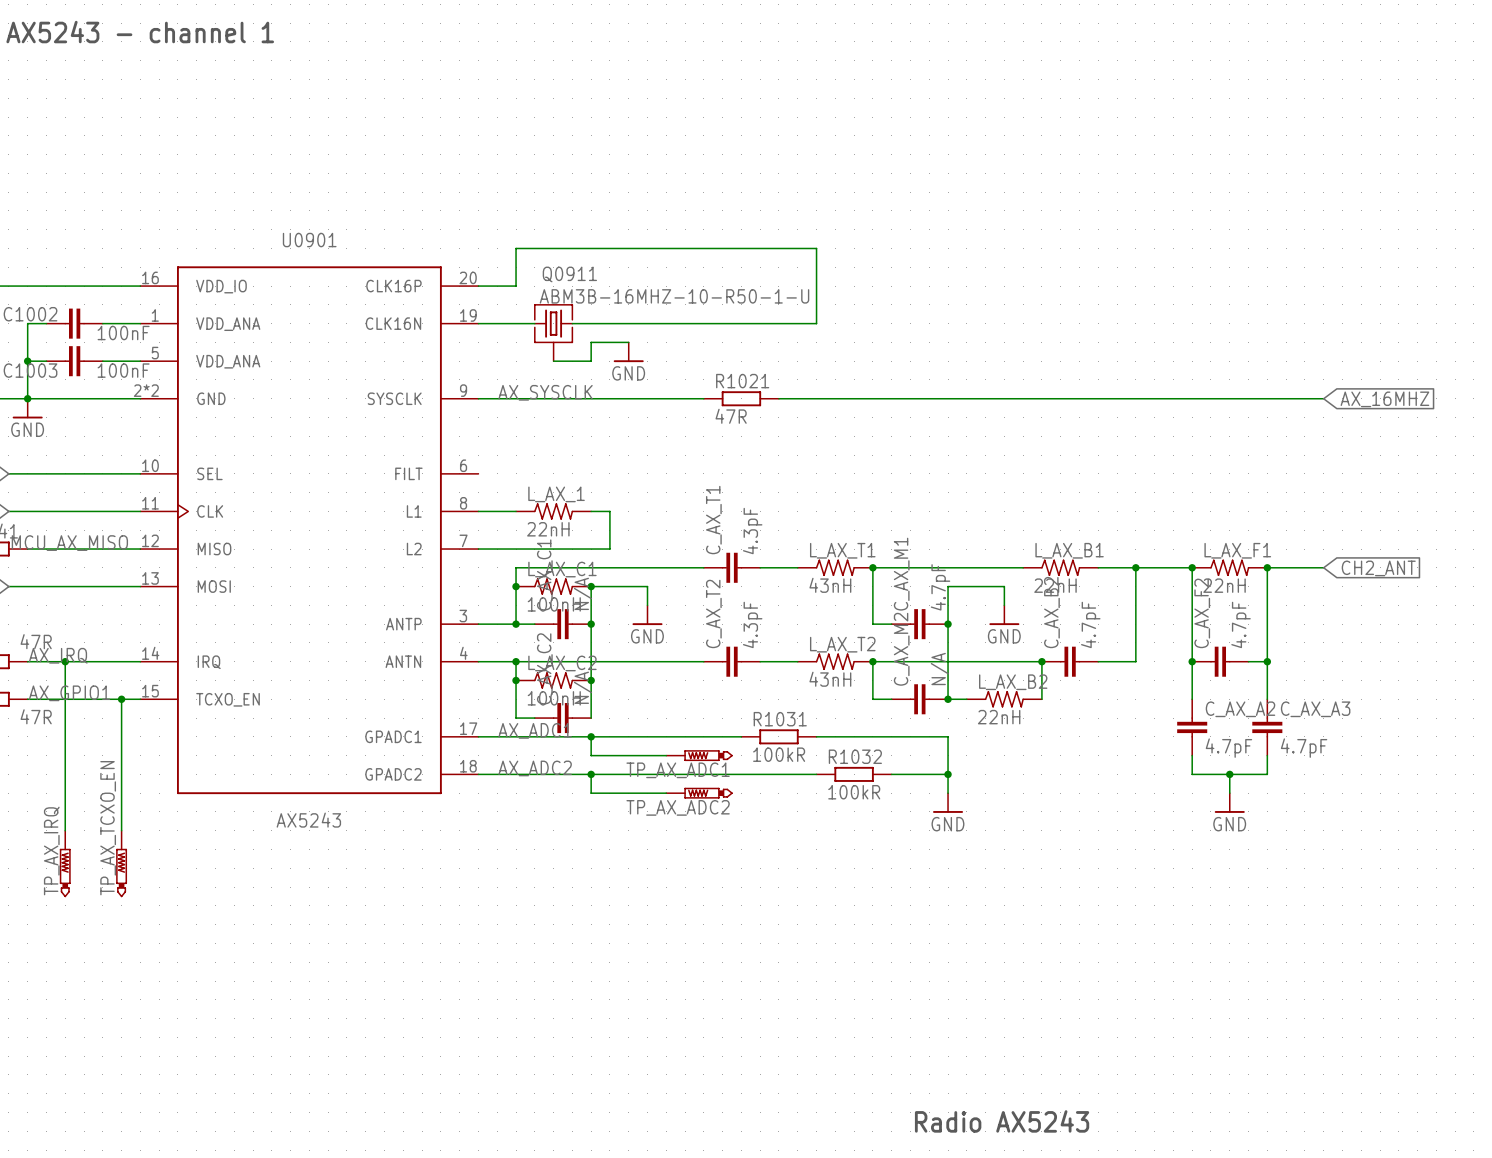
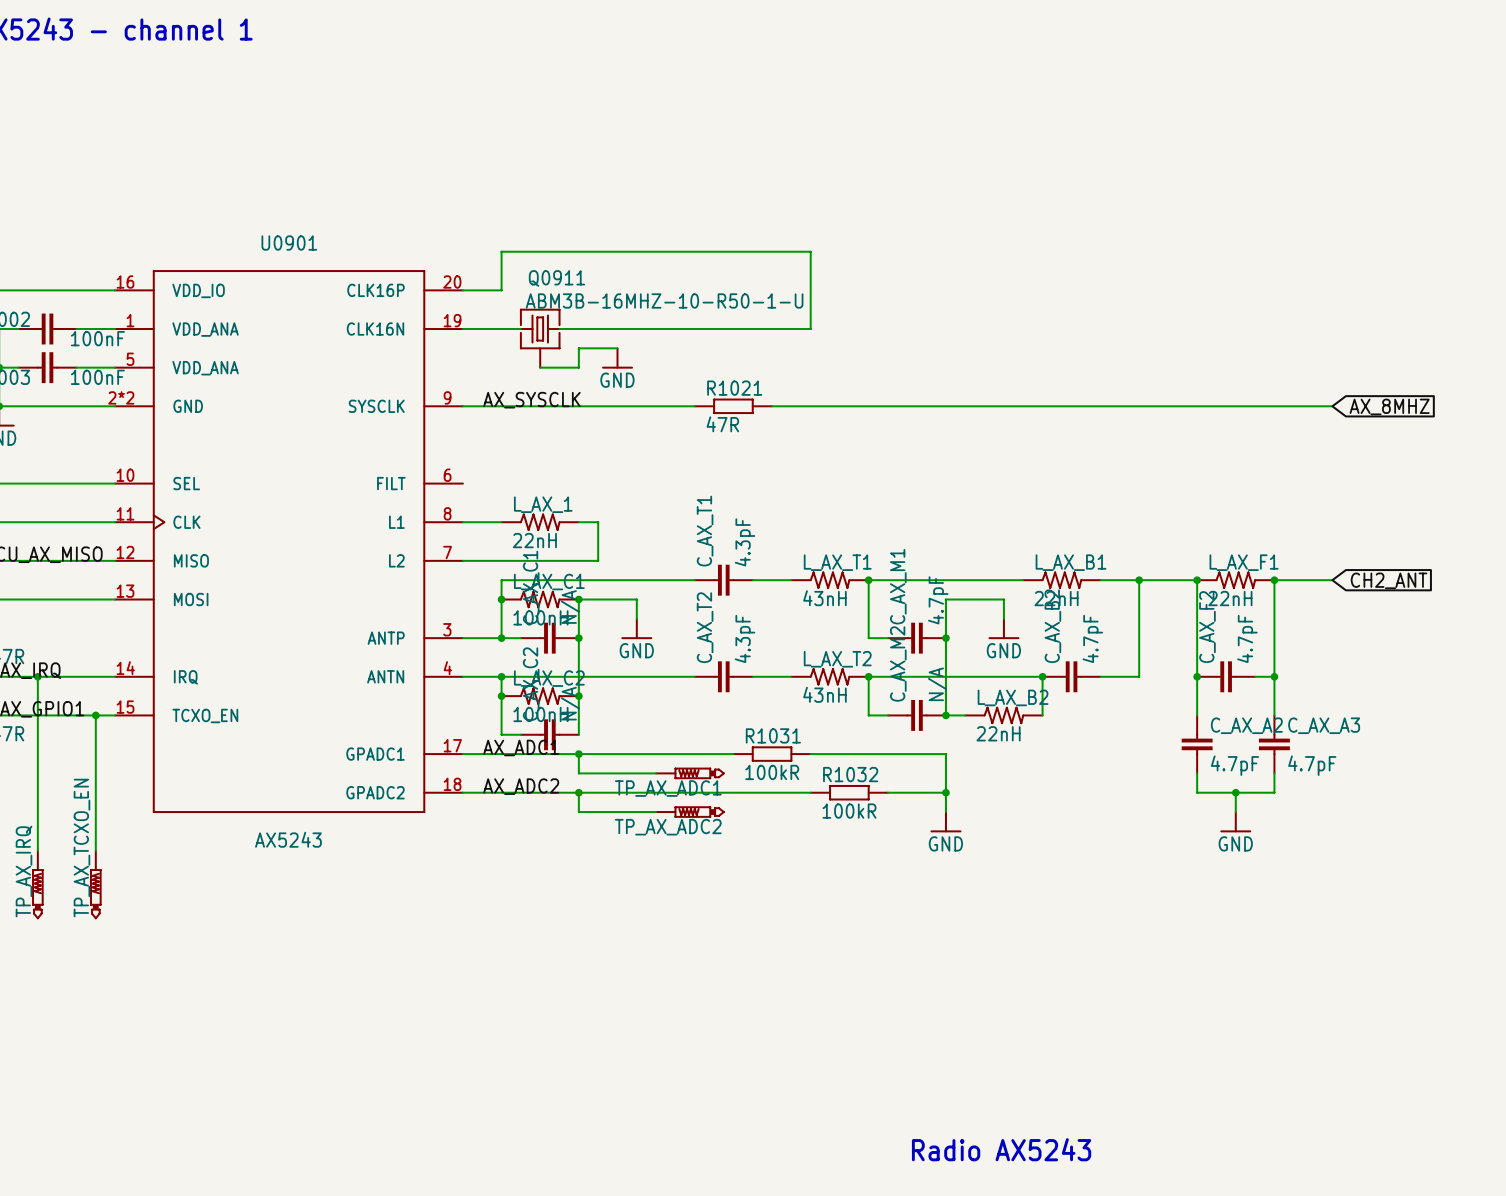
global label: AX_16MHZ (1384, 399) -> AX_8MHZ (1389, 406)

